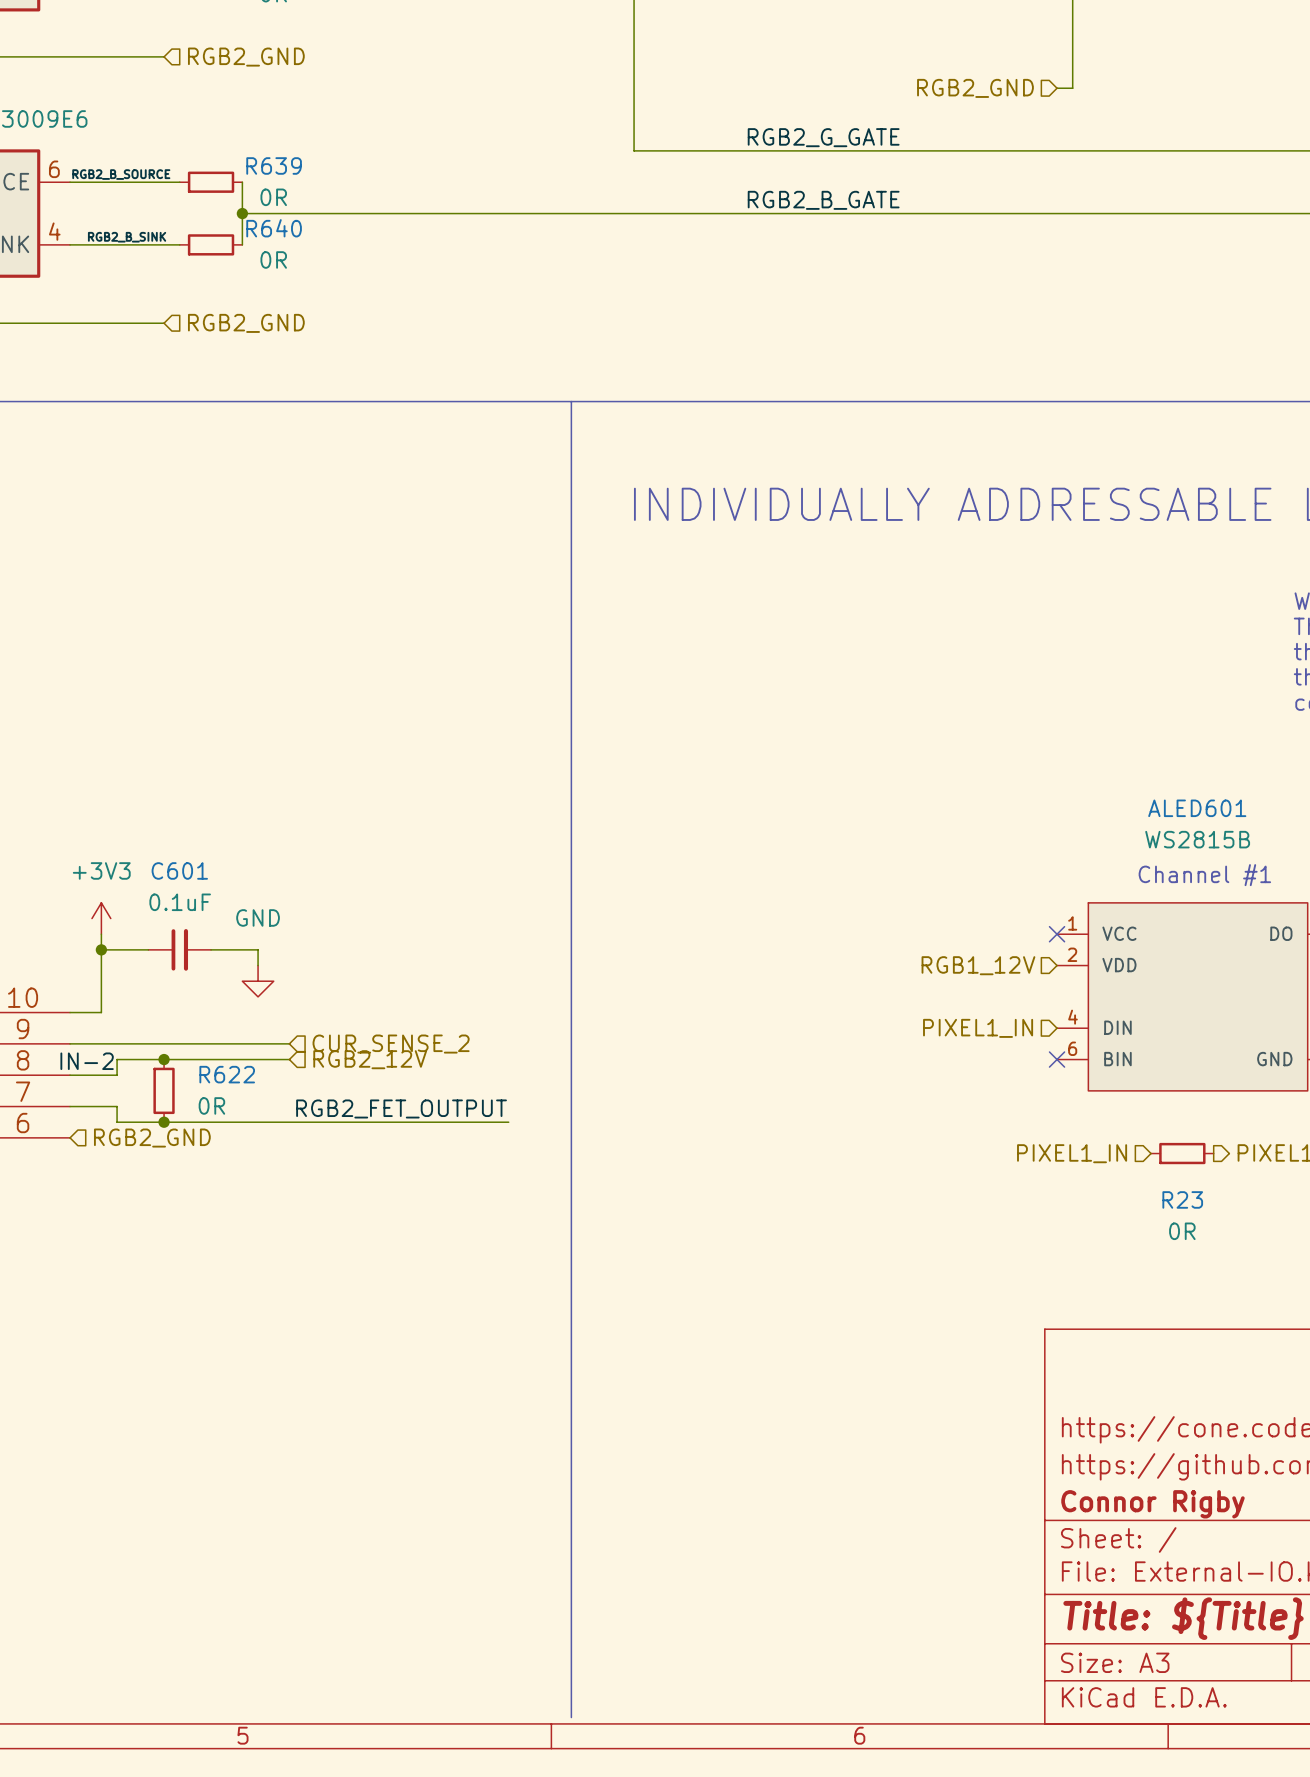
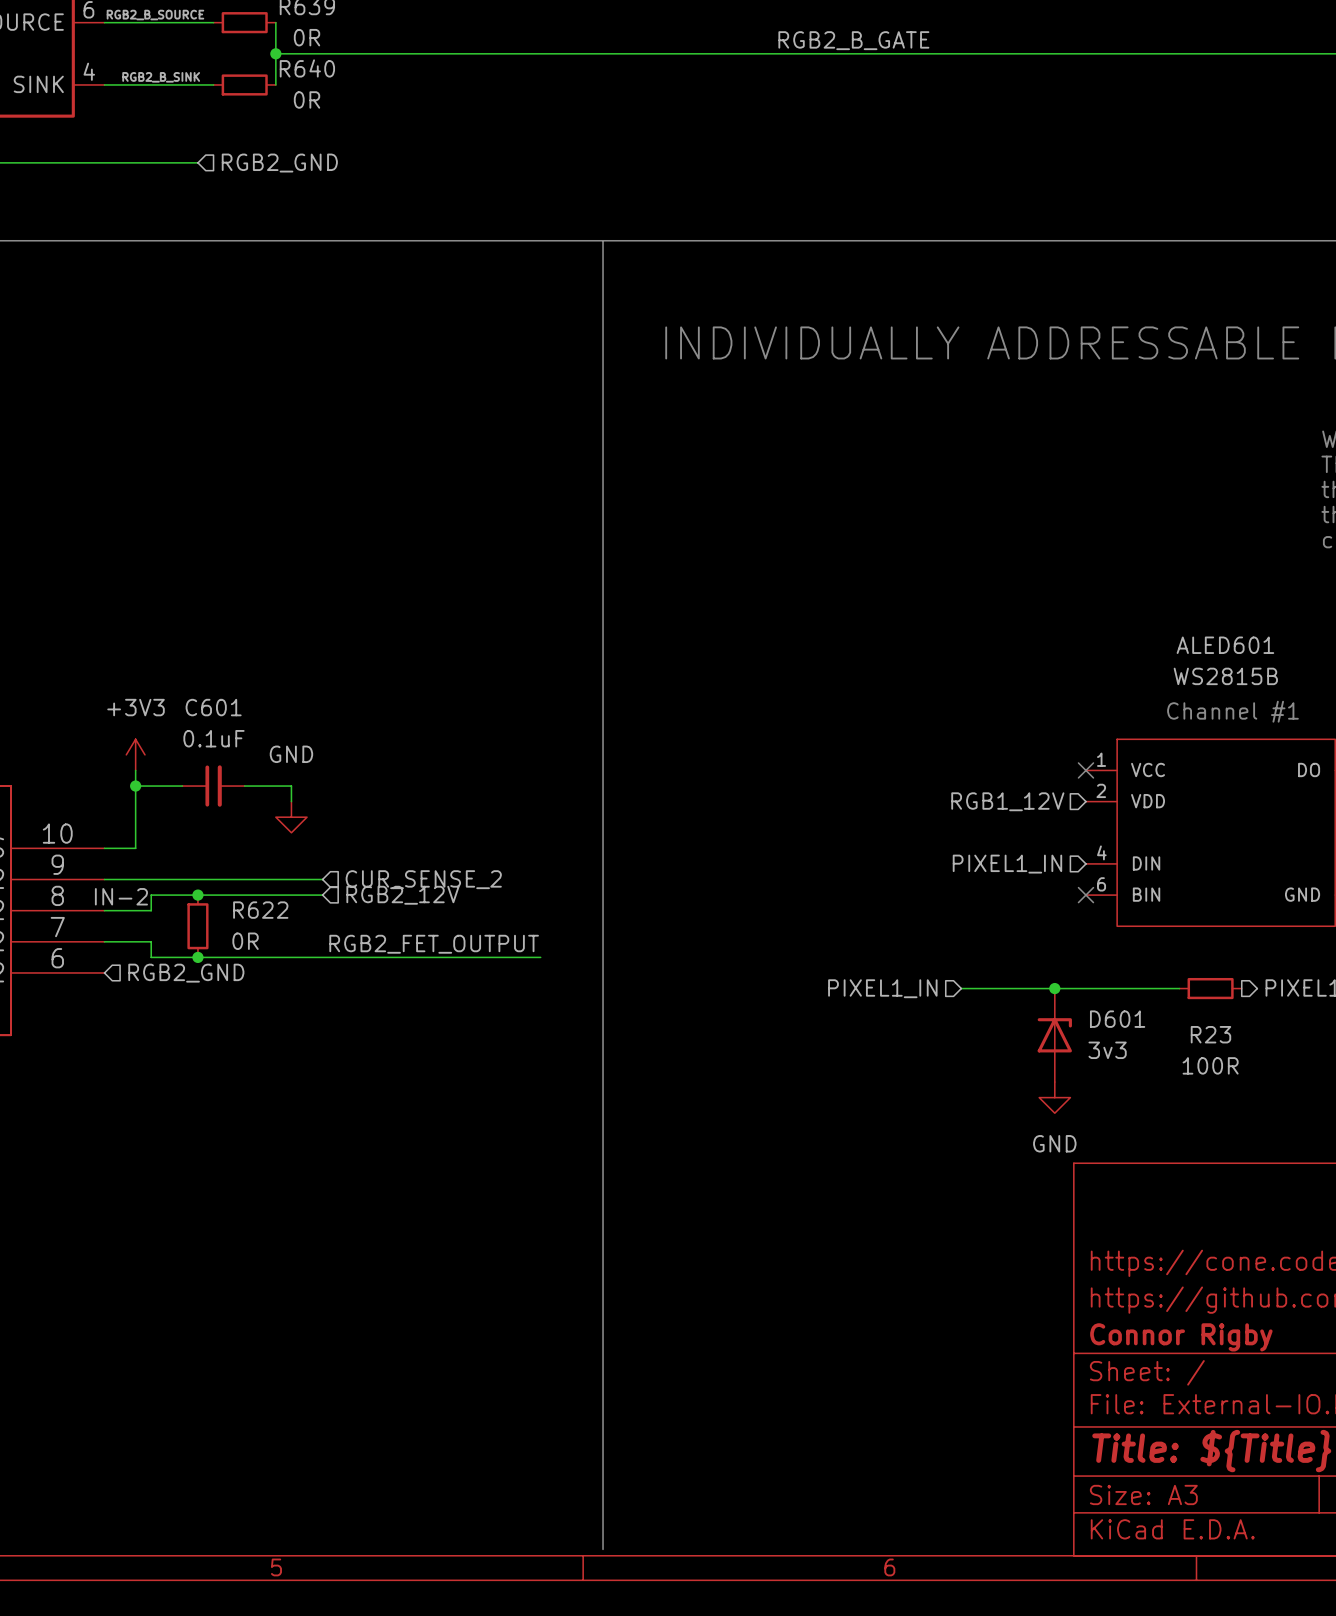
wire: none -> (961, 988) (1179, 988)
junction: none -> (1054, 988)
hierarchical label position: PIXEL1_IN (1072, 1153) -> PIXEL1_IN (882, 988)
D601: none -> 3v3 (1054, 1035)
R23 value: 0R (1182, 1231) -> 100R (1210, 1065)
power symbol: none -> GND (1054, 1097)

